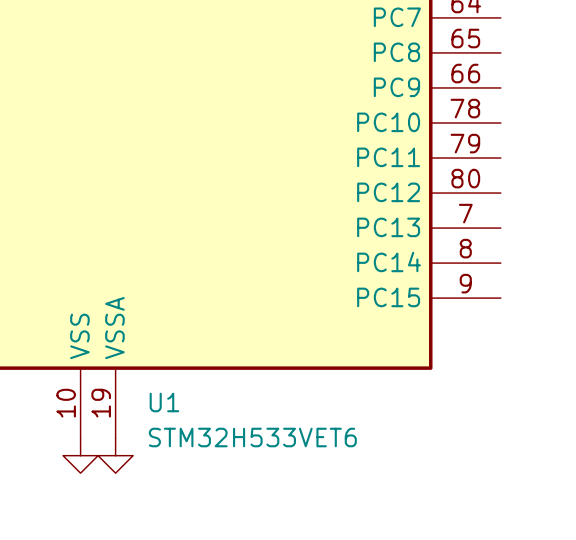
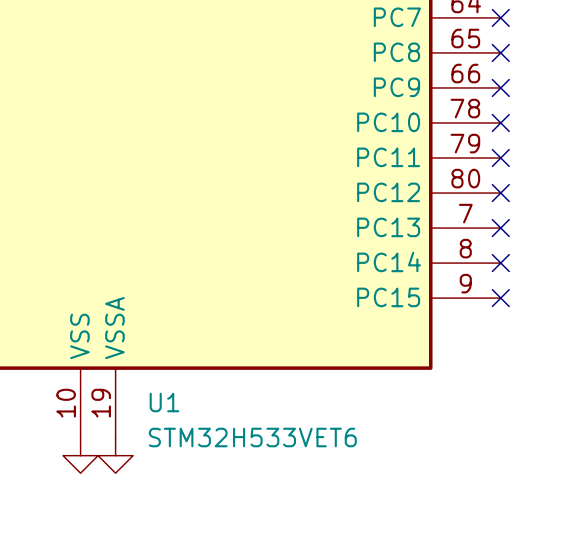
no-connect mark: none -> (500, 17)
no-connect mark: none -> (500, 52)
no-connect mark: none -> (500, 87)
no-connect mark: none -> (500, 122)
no-connect mark: none -> (500, 158)
no-connect mark: none -> (500, 193)
no-connect mark: none -> (500, 228)
no-connect mark: none -> (500, 263)
no-connect mark: none -> (500, 298)

